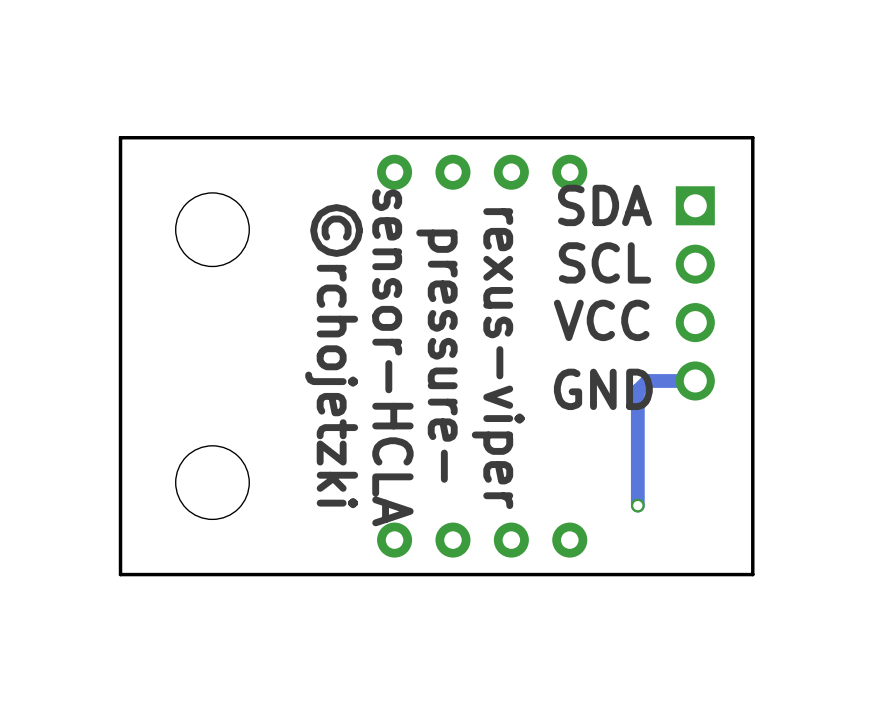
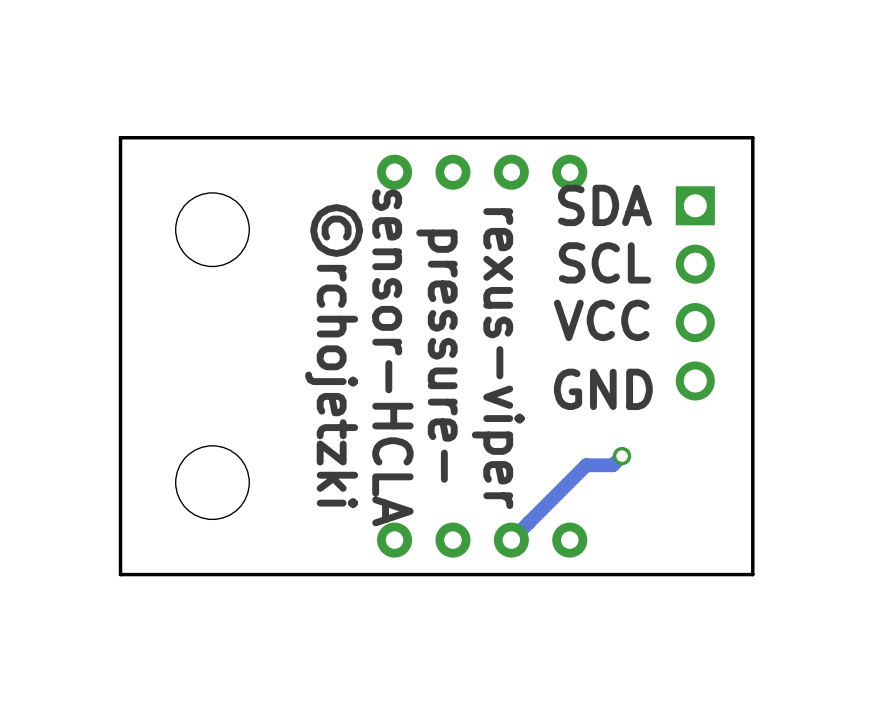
track: (695, 380) (647, 380) (637, 390) (637, 505) -> none
track: none -> (622, 456) (612, 465) (586, 465) (511, 540)
via: none -> (622, 456)
via: (637, 505) -> none

